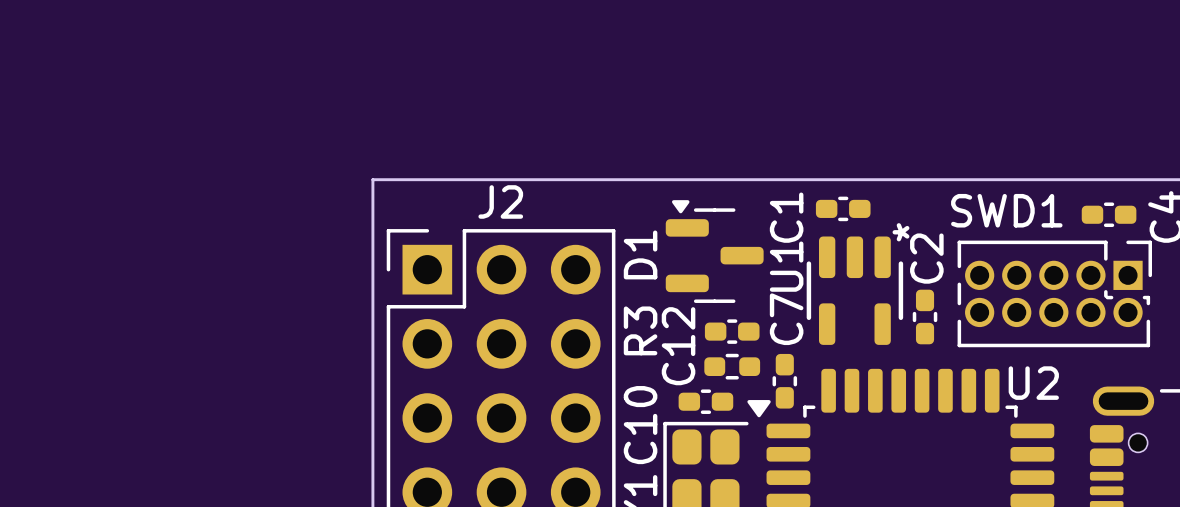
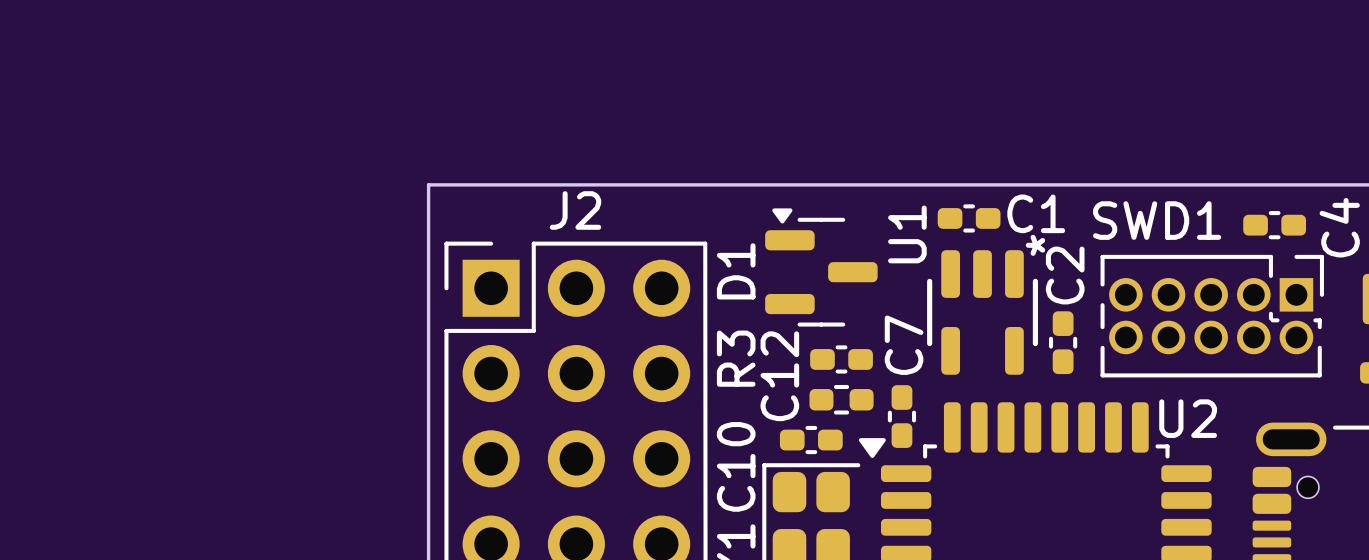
C1 name rotation: 0° (786, 217) -> 90° clockwise (1036, 213)
C1 name position: C1 (786, 217) -> C1 (1036, 213)
U1 name position: U1 (786, 266) -> U1 (907, 234)

